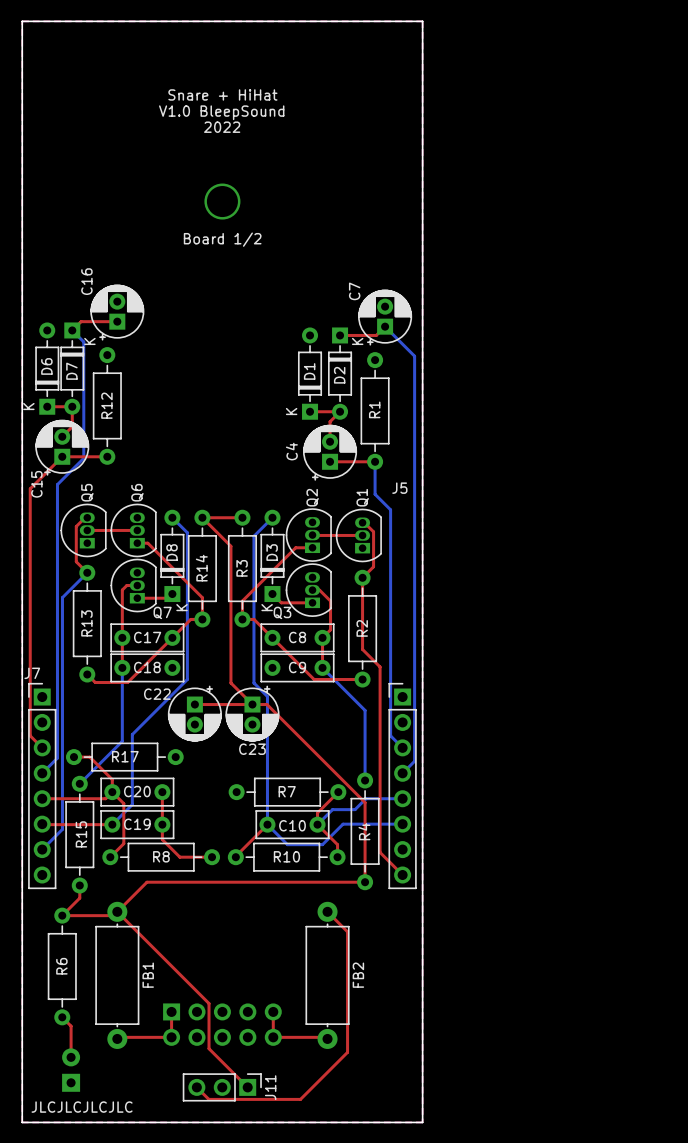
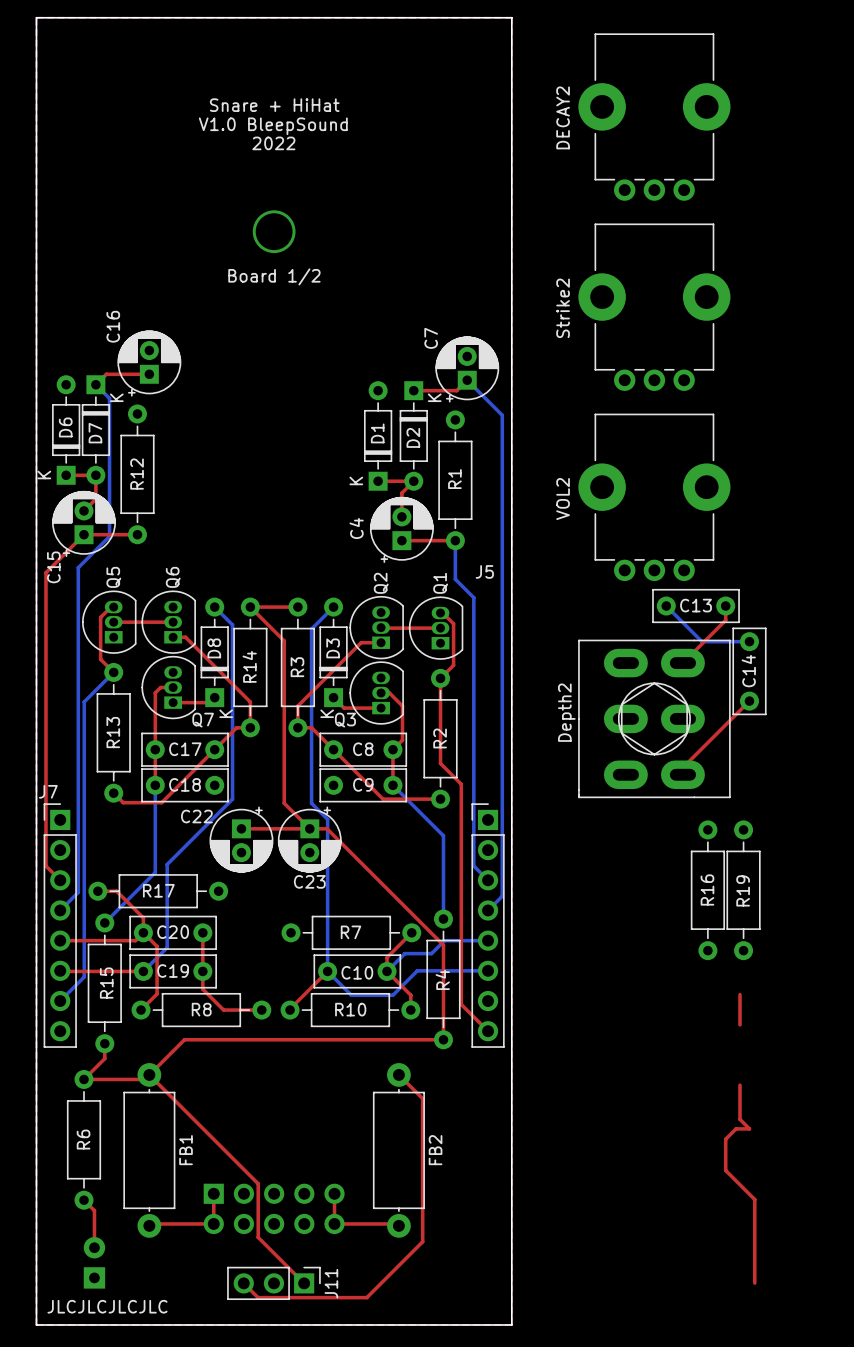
DECAY2: none -> (654, 117)
Strike2: none -> (654, 307)
VOL2: none -> (654, 497)
bottom track: none -> (666, 606) (701, 641) (749, 641)
C13: none -> (696, 606)
top track: none -> (725, 606) (725, 620) (682, 663)
C14: none -> (749, 671)
top track: none -> (749, 701) (682, 767) (682, 774)
Depth2: none -> (654, 718)
R16: none -> (707, 890)
R19: none -> (743, 890)
top track: none -> (739, 994) (739, 1024)
top track: none -> (739, 1085) (739, 1119) (749, 1128) (736, 1128) (725, 1139) (725, 1170) (754, 1199) (754, 1283)

